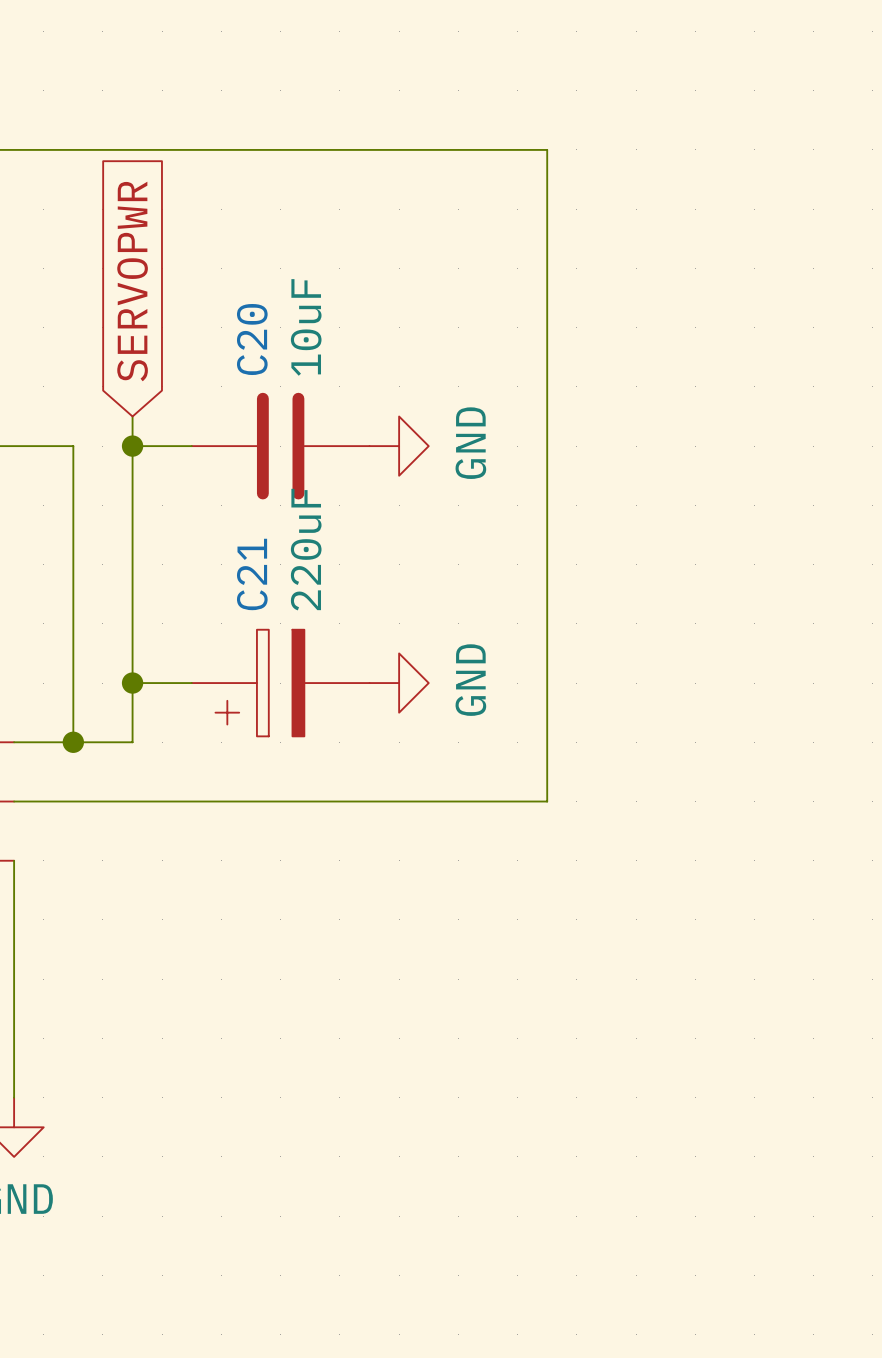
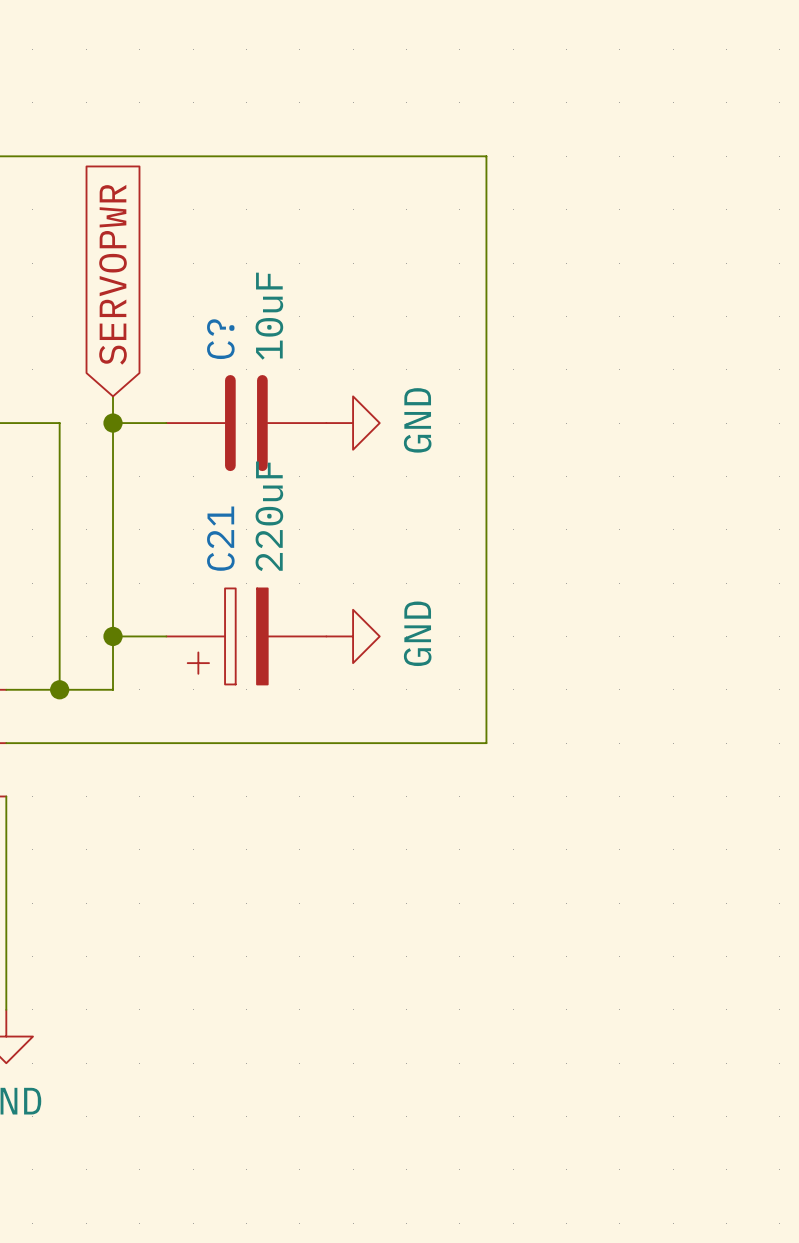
C20 name: C20 (252, 339) -> C? (220, 339)

